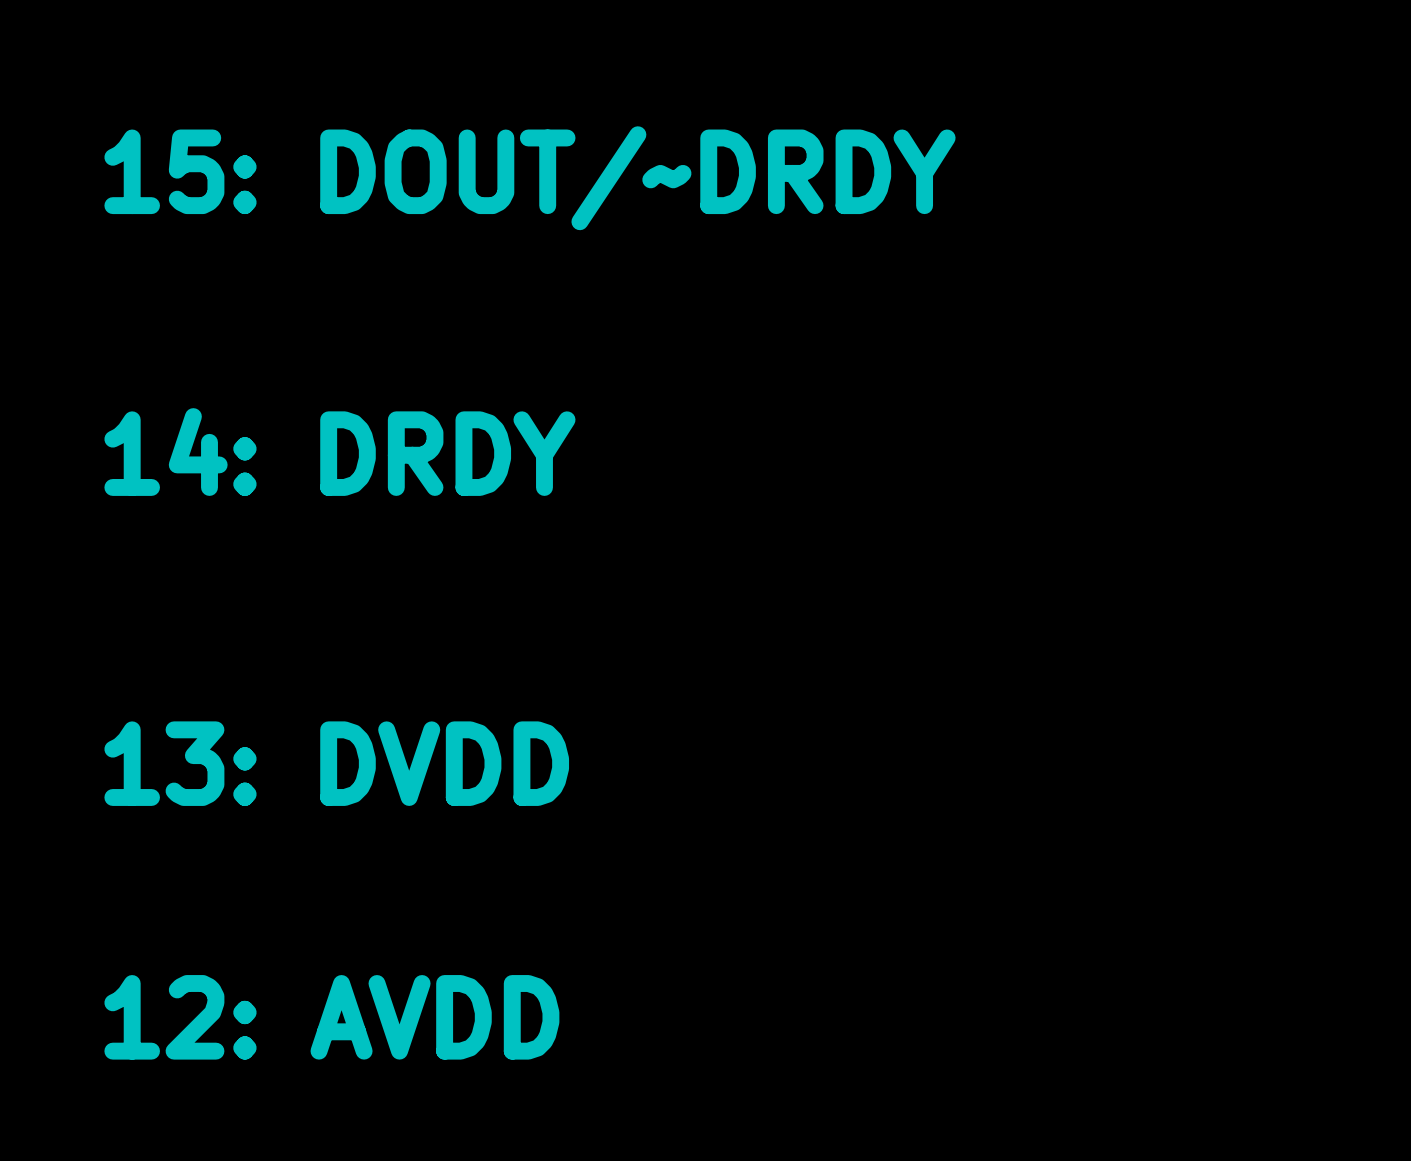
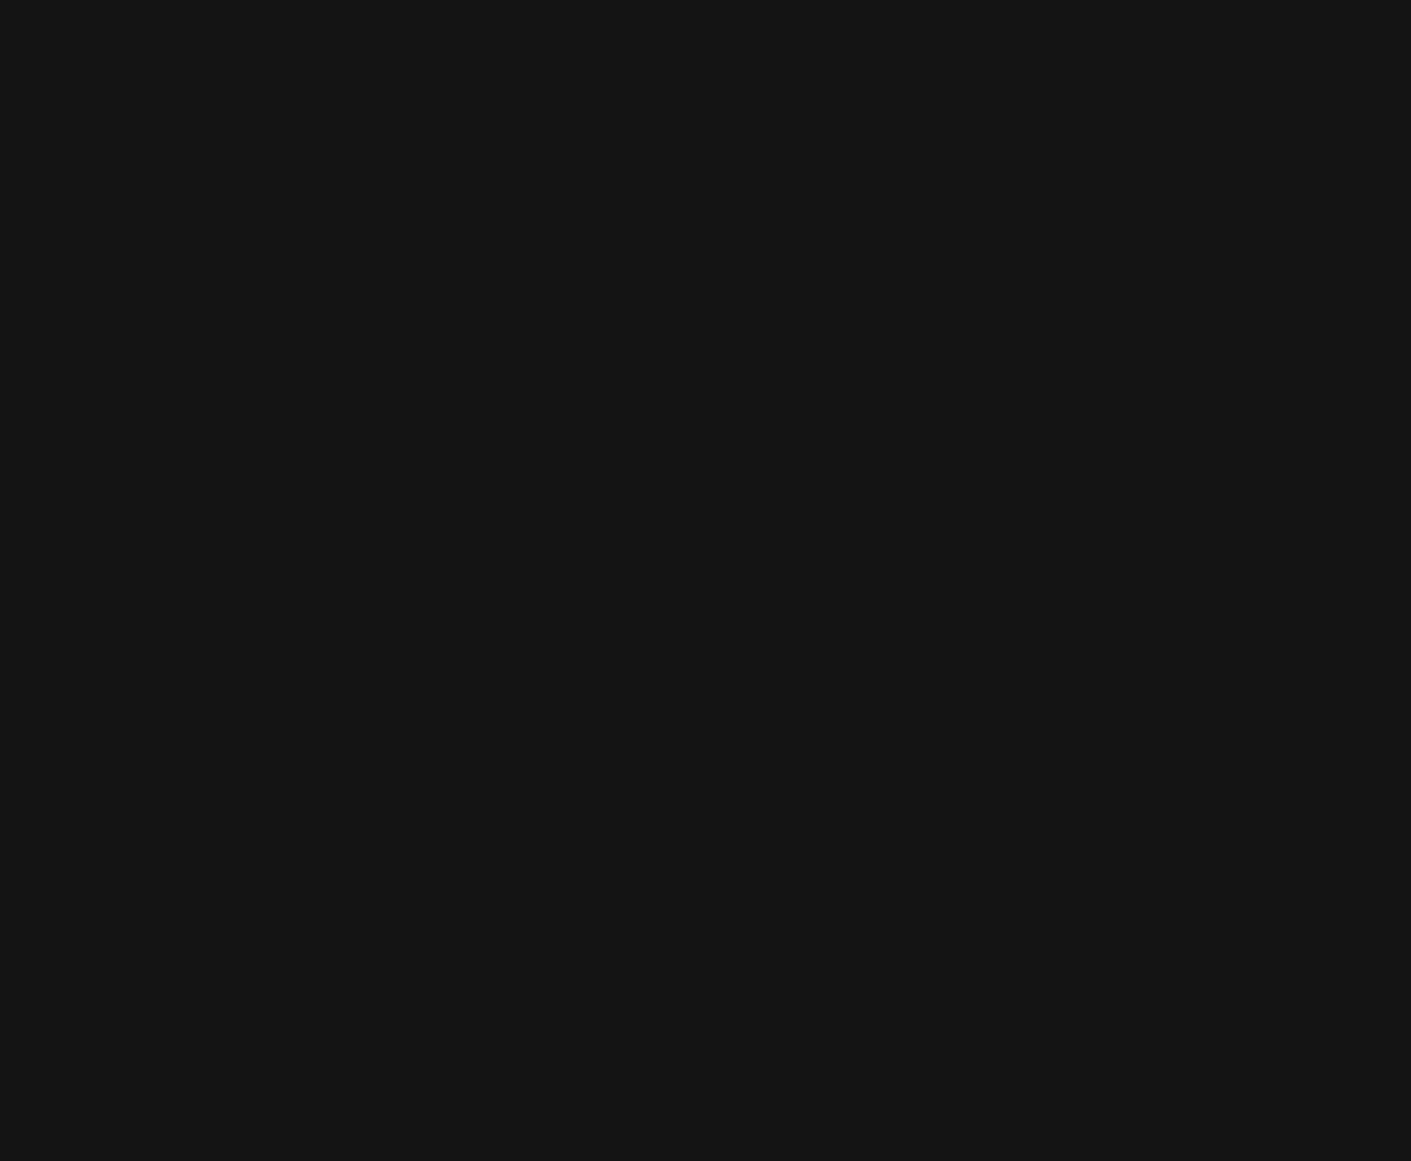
text: 15: DOUT/~DRDY (529, 178) -> none
text: 14: DRDY (339, 452) -> none
text: 13: DVDD (336, 763) -> none
text: 12: AVDD (331, 1017) -> none

